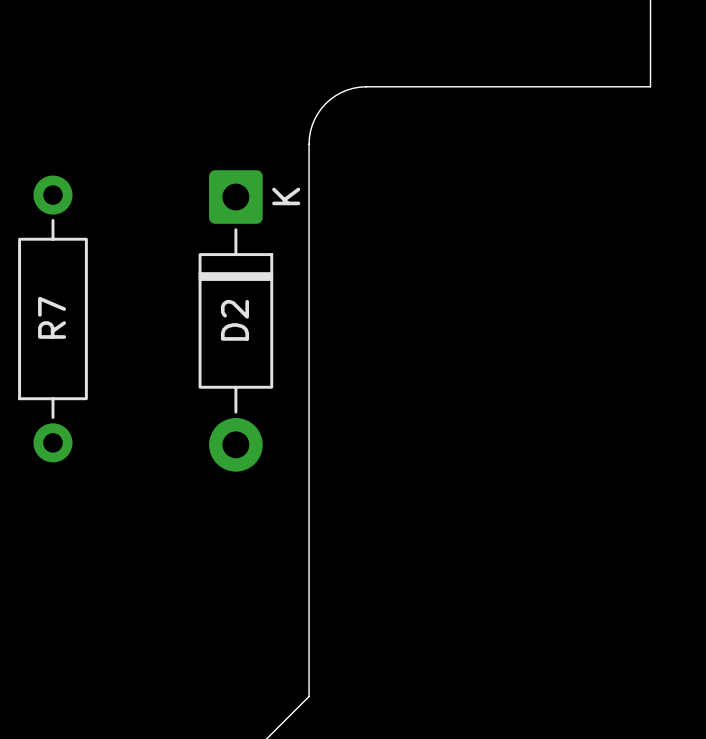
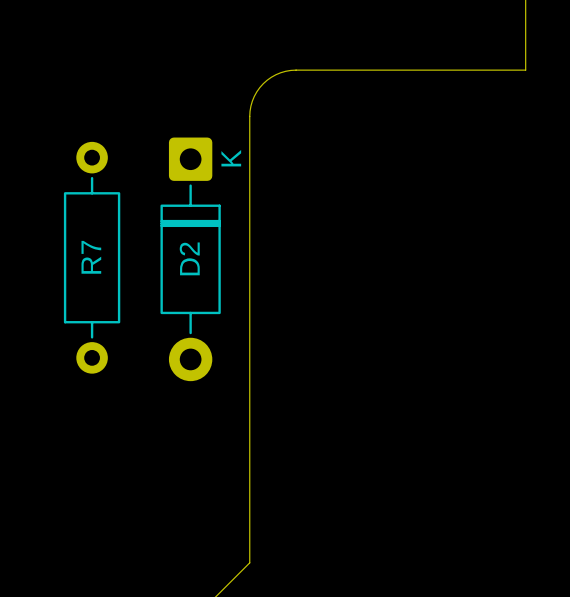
R7 position: (52, 318) -> (92, 257)

